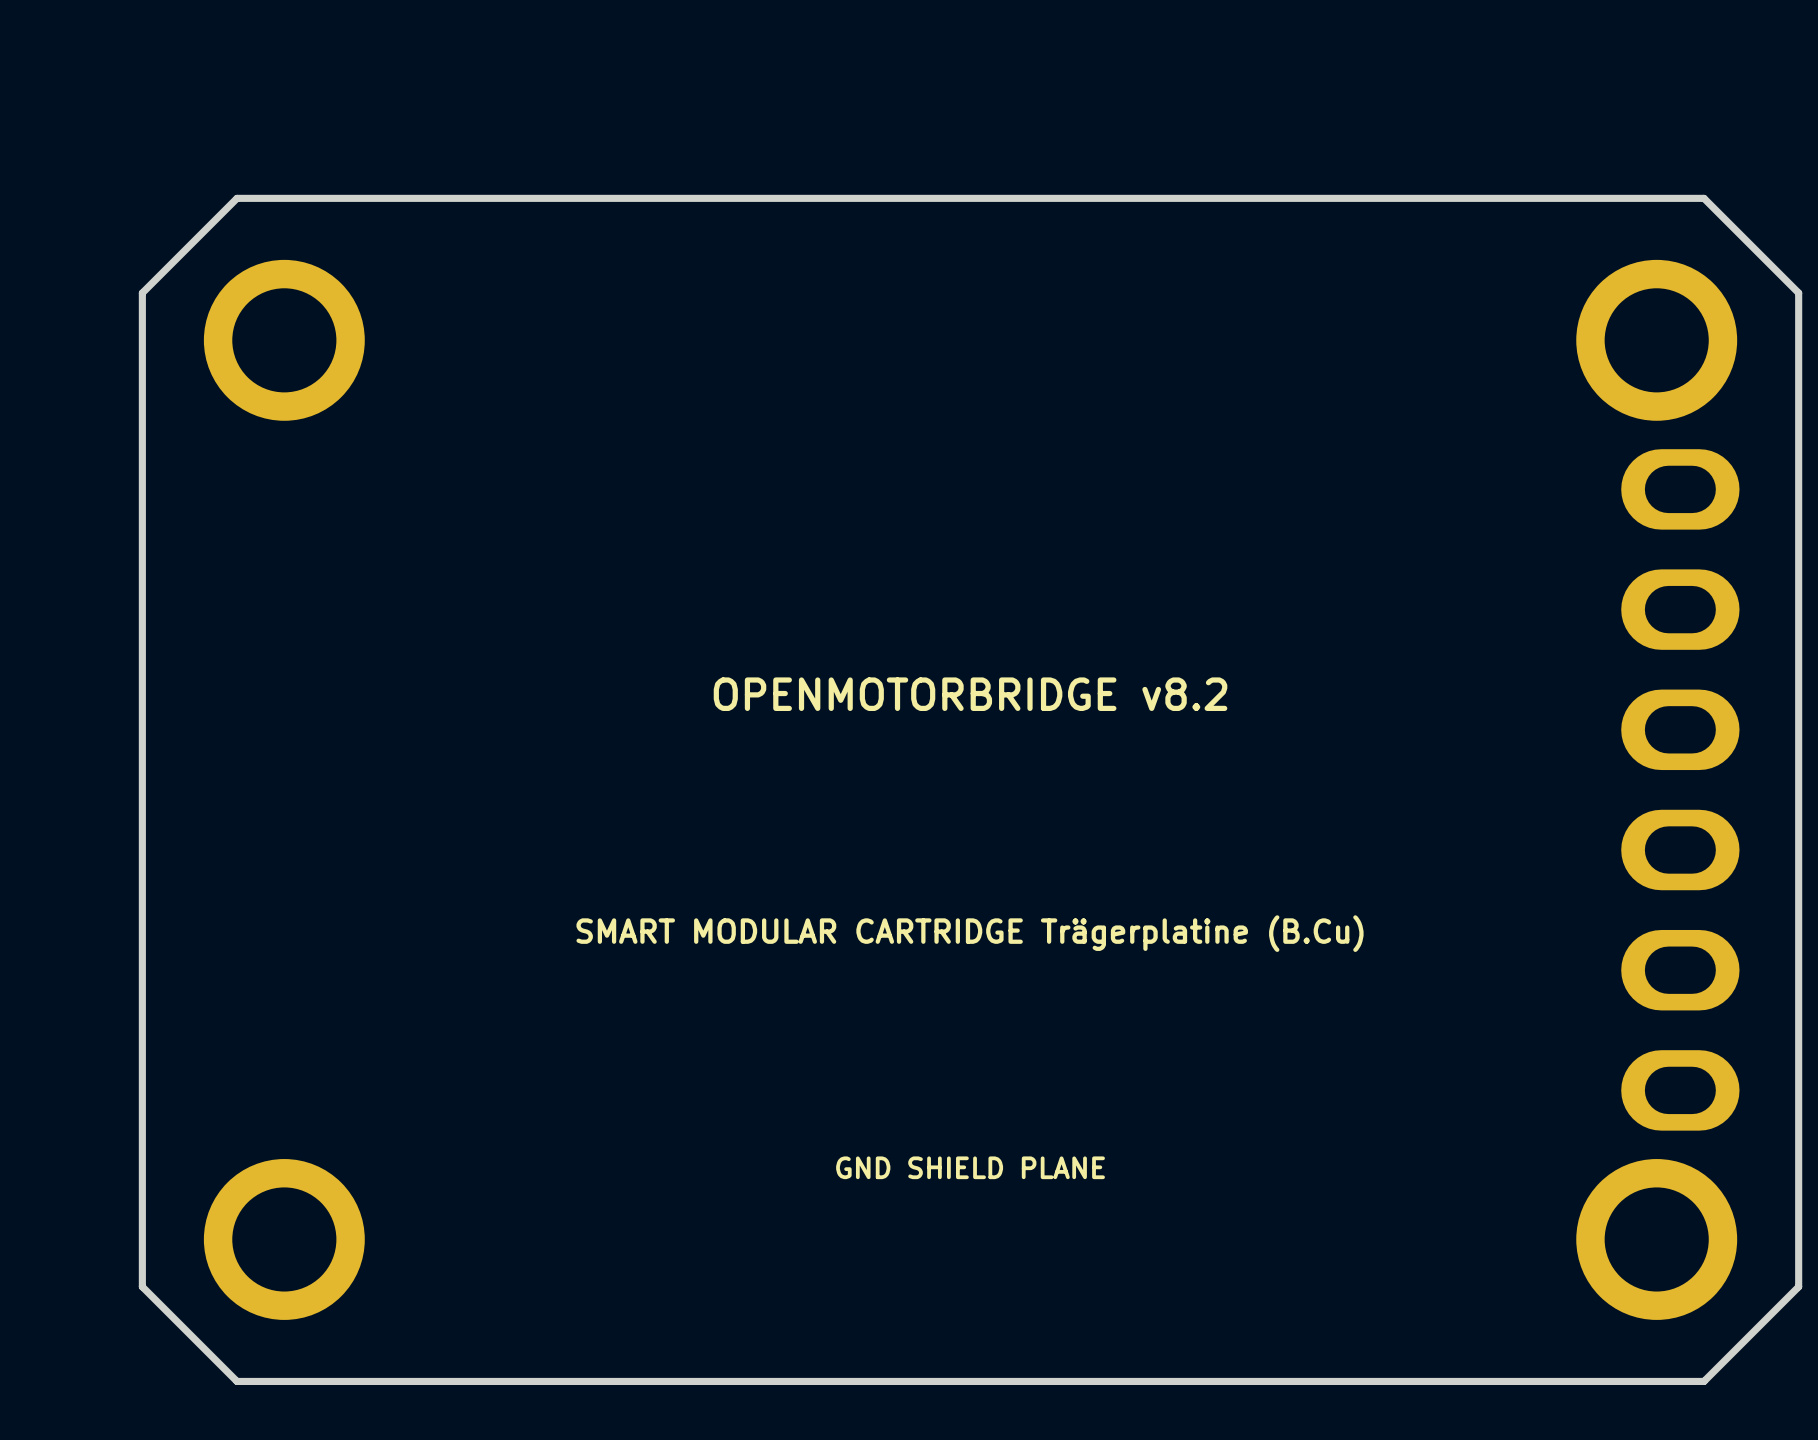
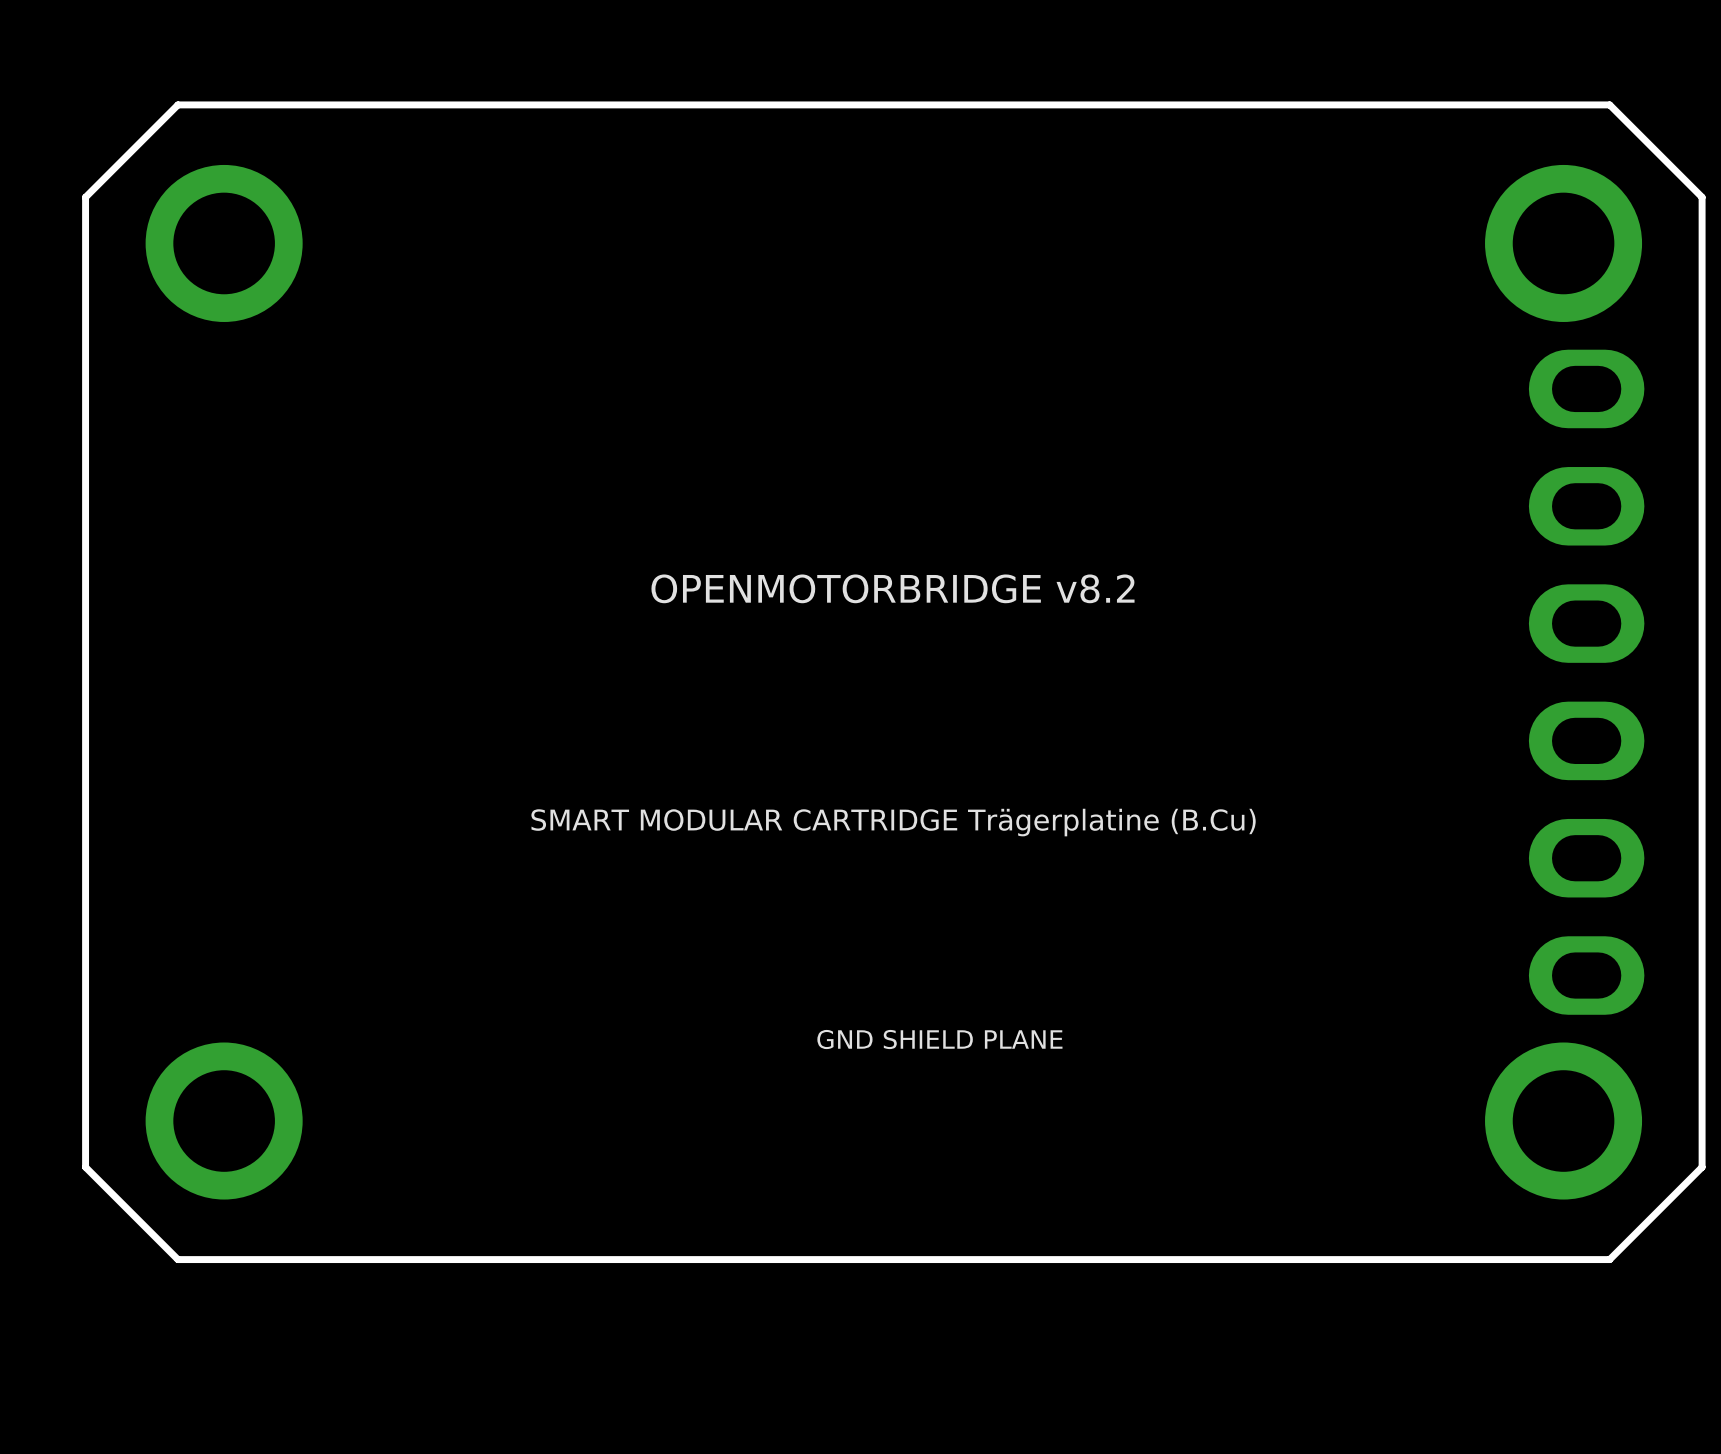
text position: GND SHIELD PLANE (970, 1167) -> GND SHIELD PLANE (939, 1039)

